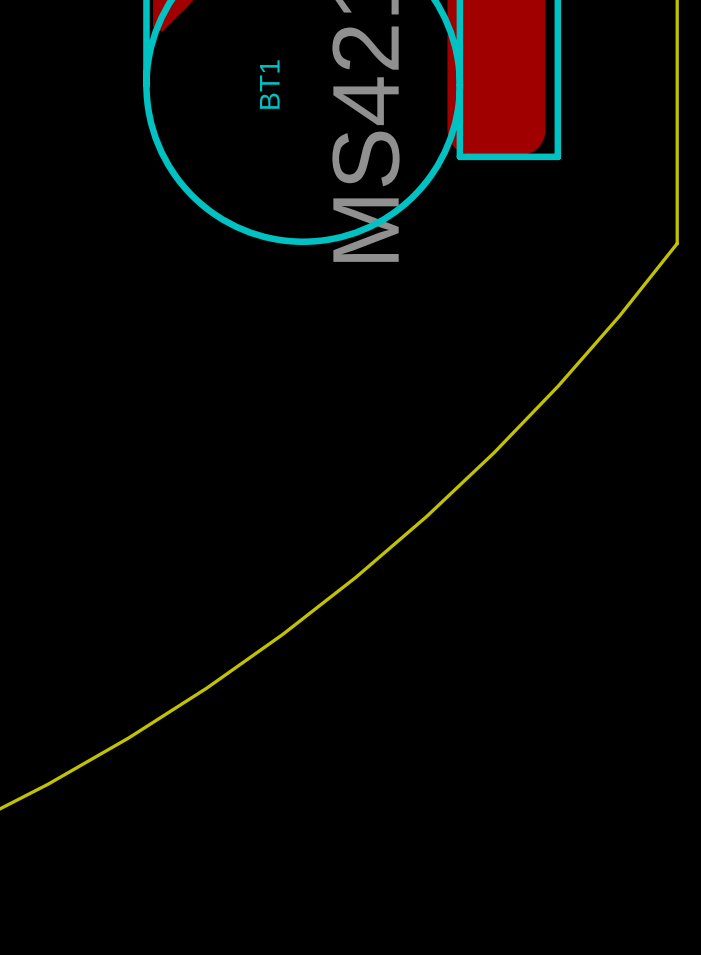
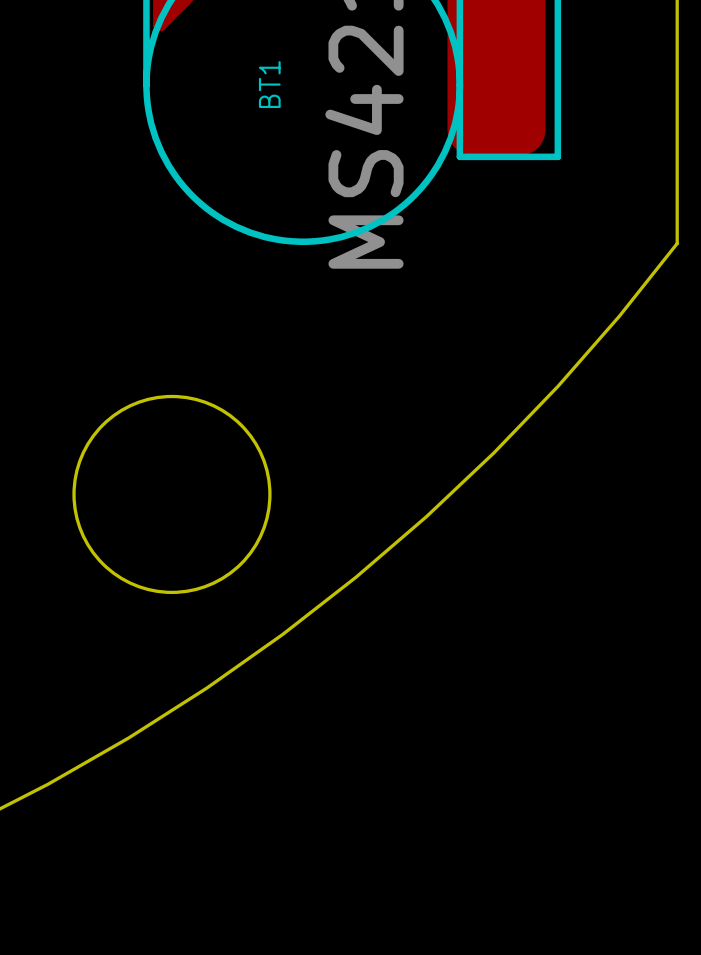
round board edge: none -> [72, 394, 272, 595]

